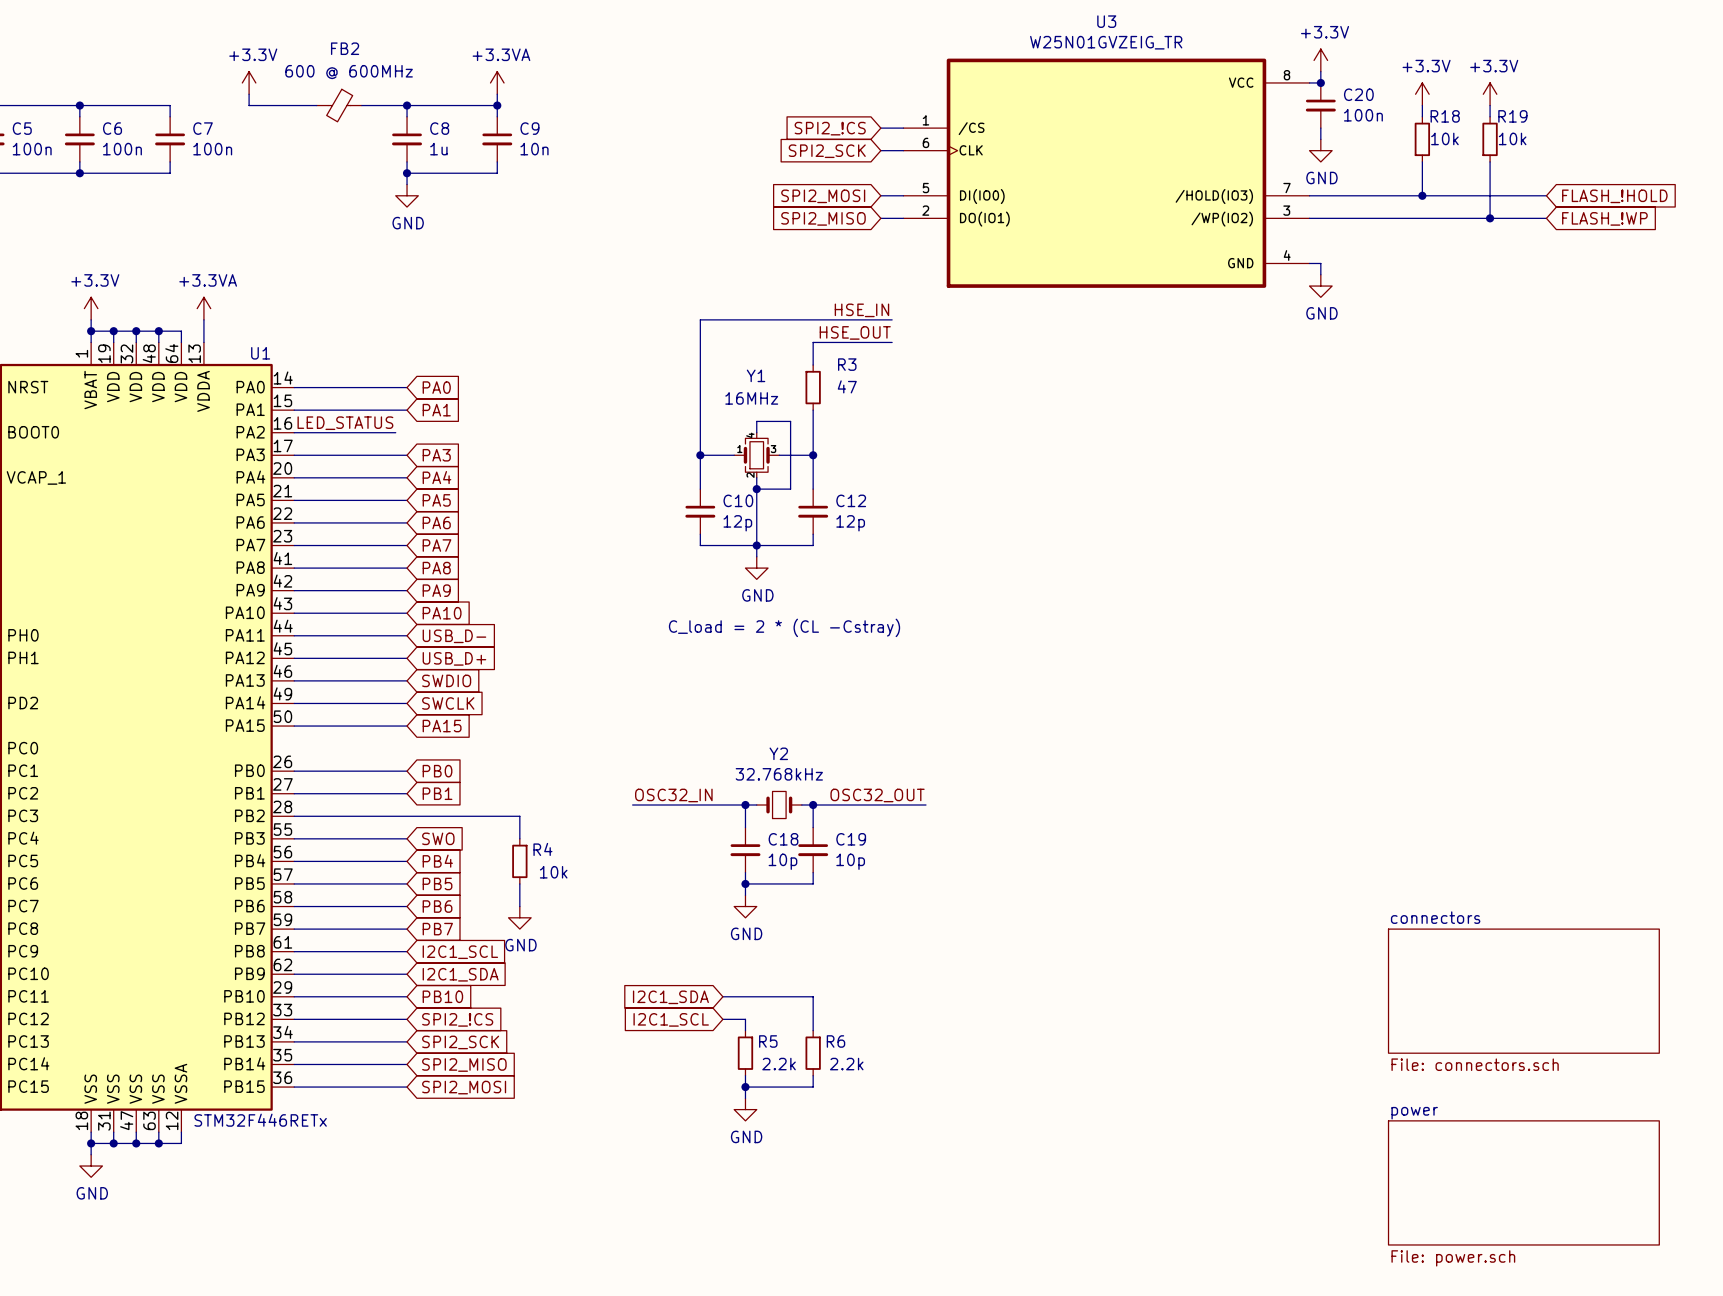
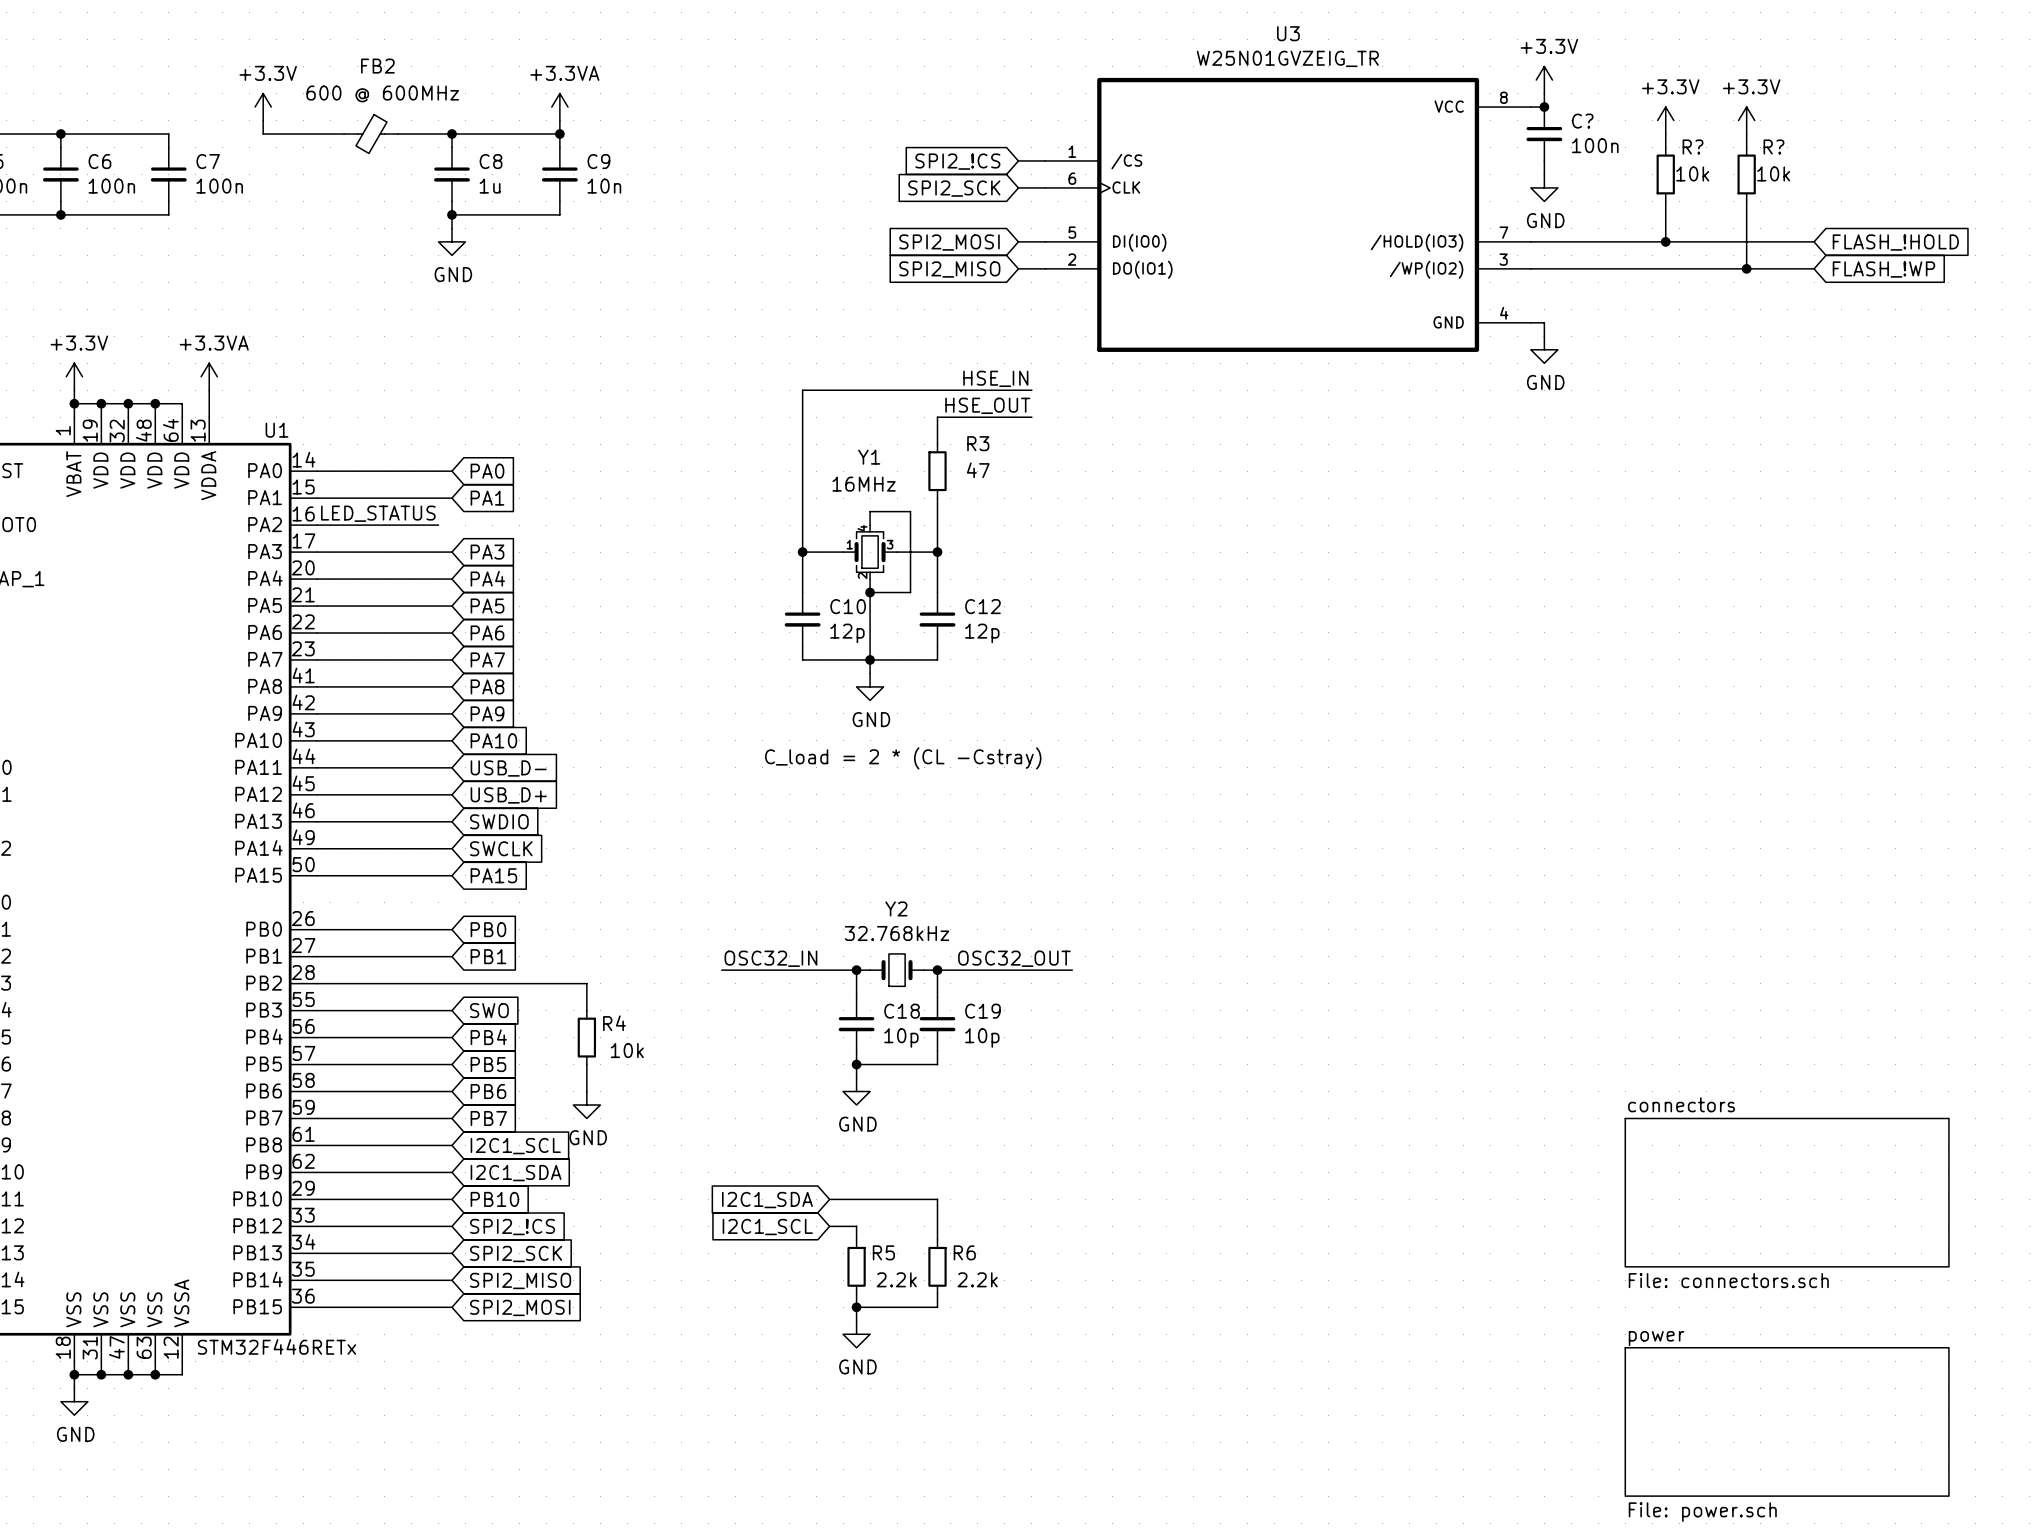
C20 name: C20 (1358, 94) -> C? (1582, 121)
R18 name: R18 (1445, 116) -> R? (1693, 146)
R19 name: R19 (1512, 116) -> R? (1773, 146)

